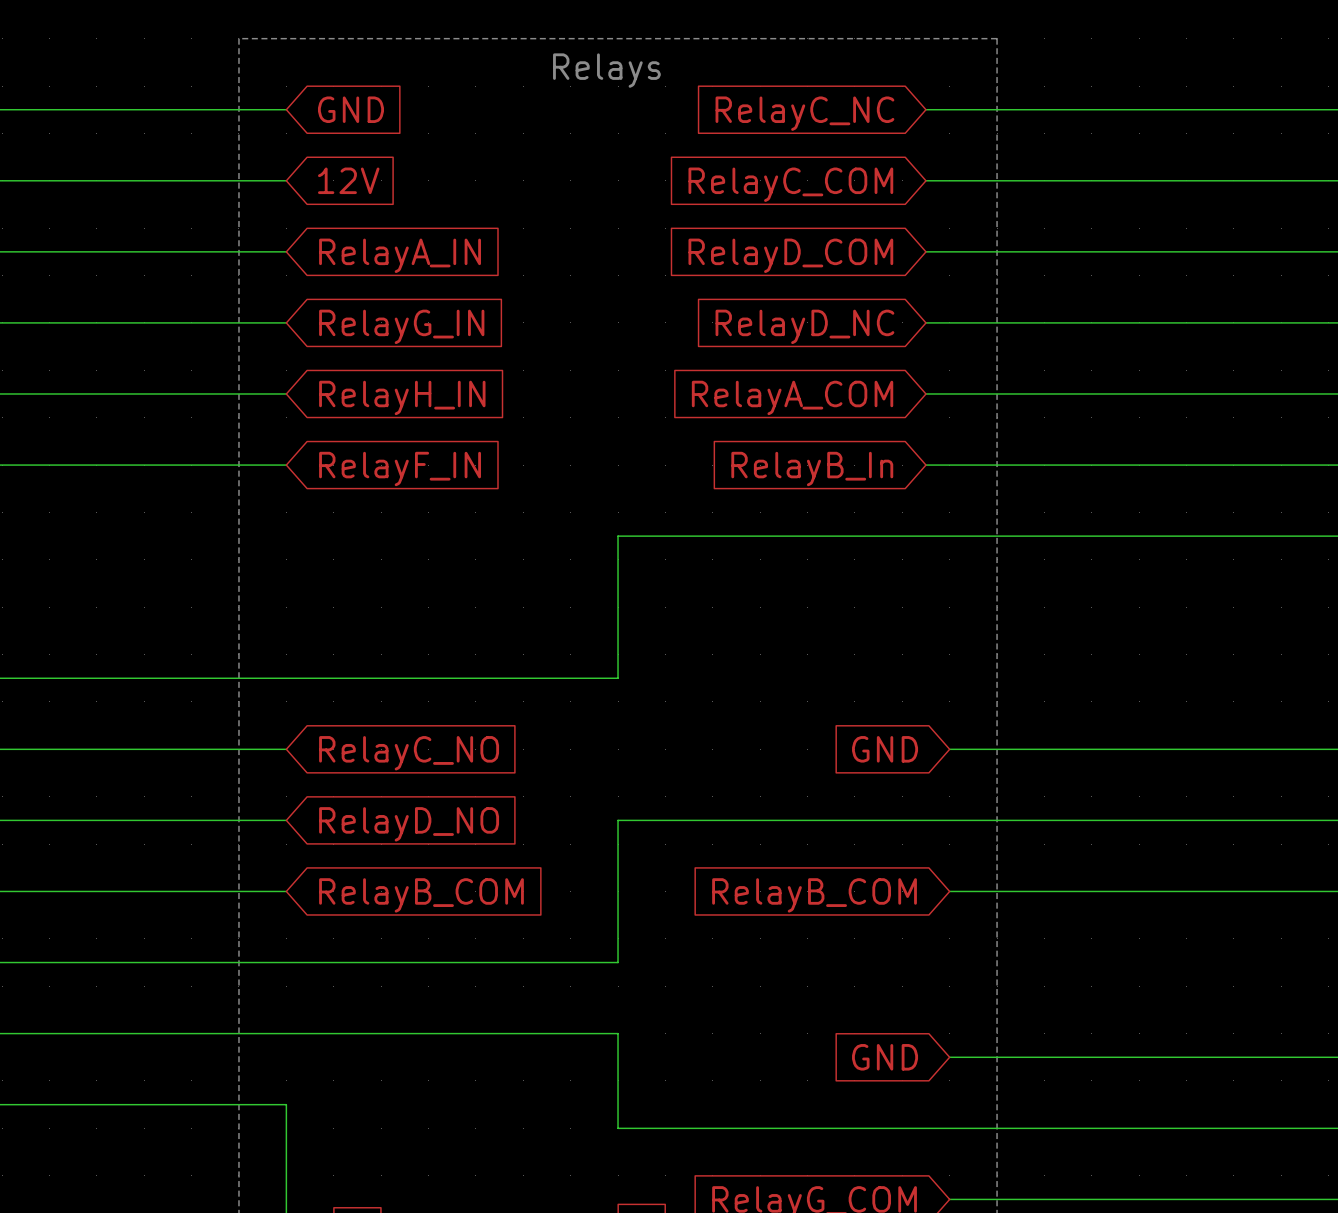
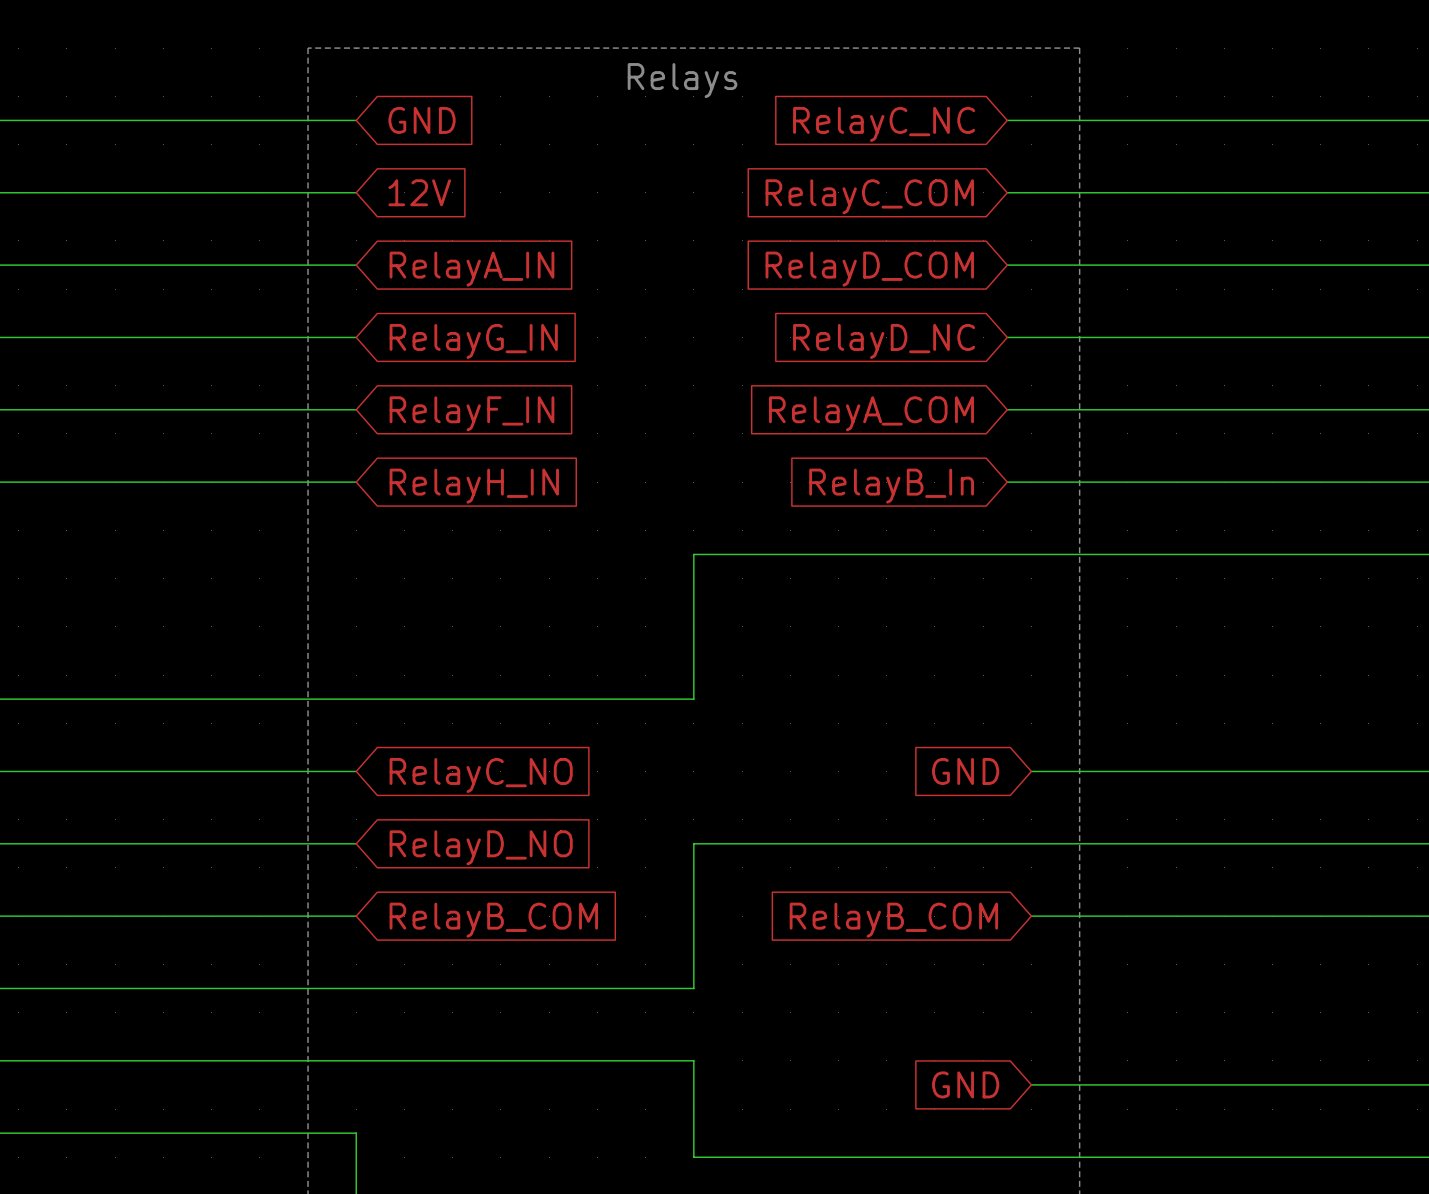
global label: RelayH_IN (402, 397) -> RelayF_IN (471, 413)
global label: RelayF_IN (400, 469) -> RelayH_IN (474, 486)

